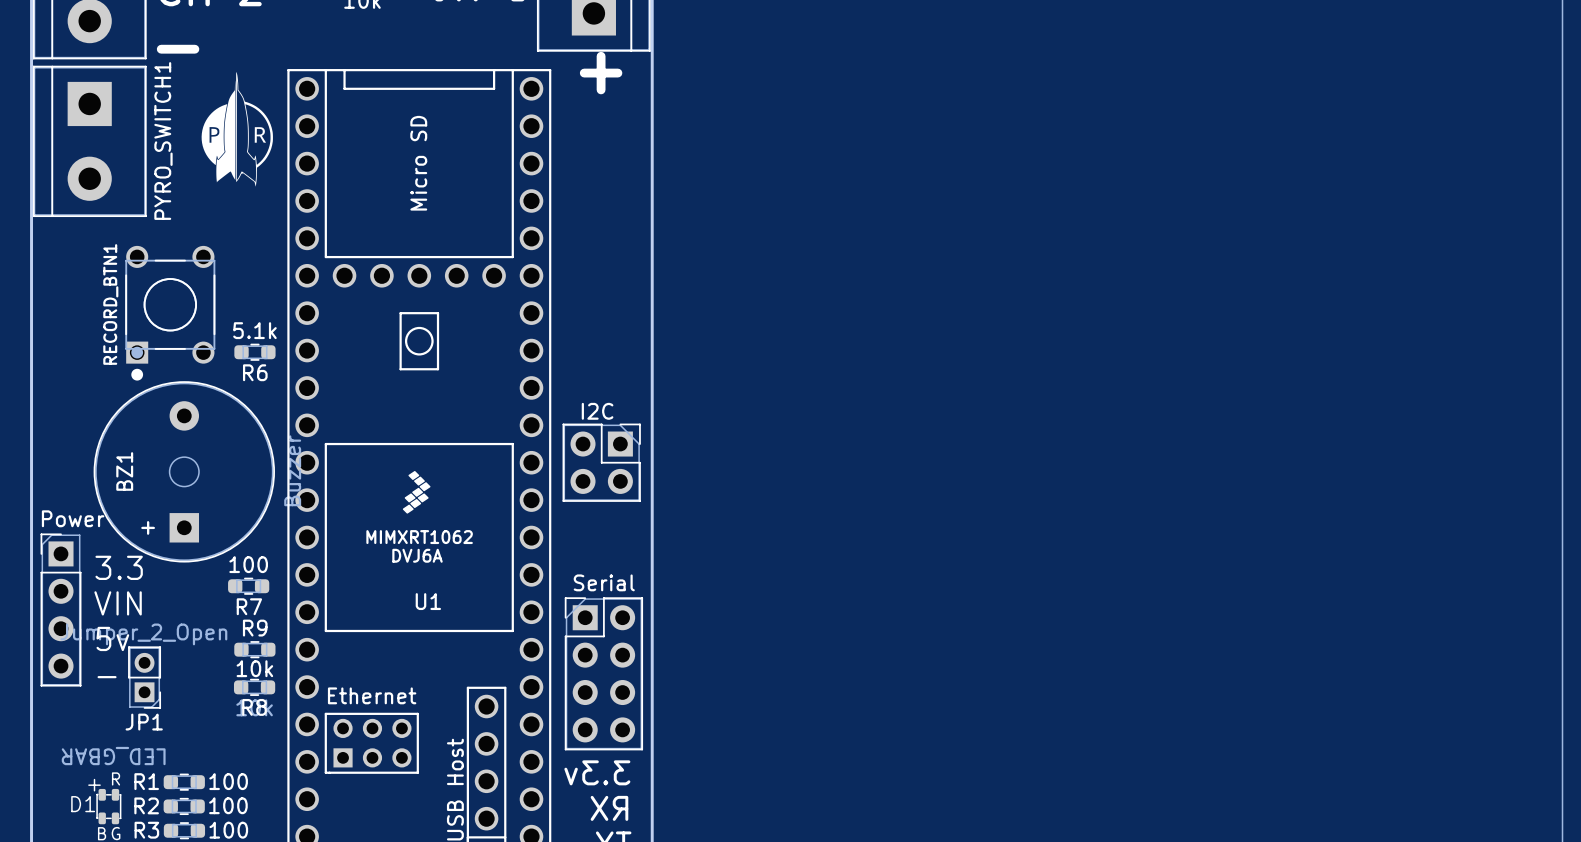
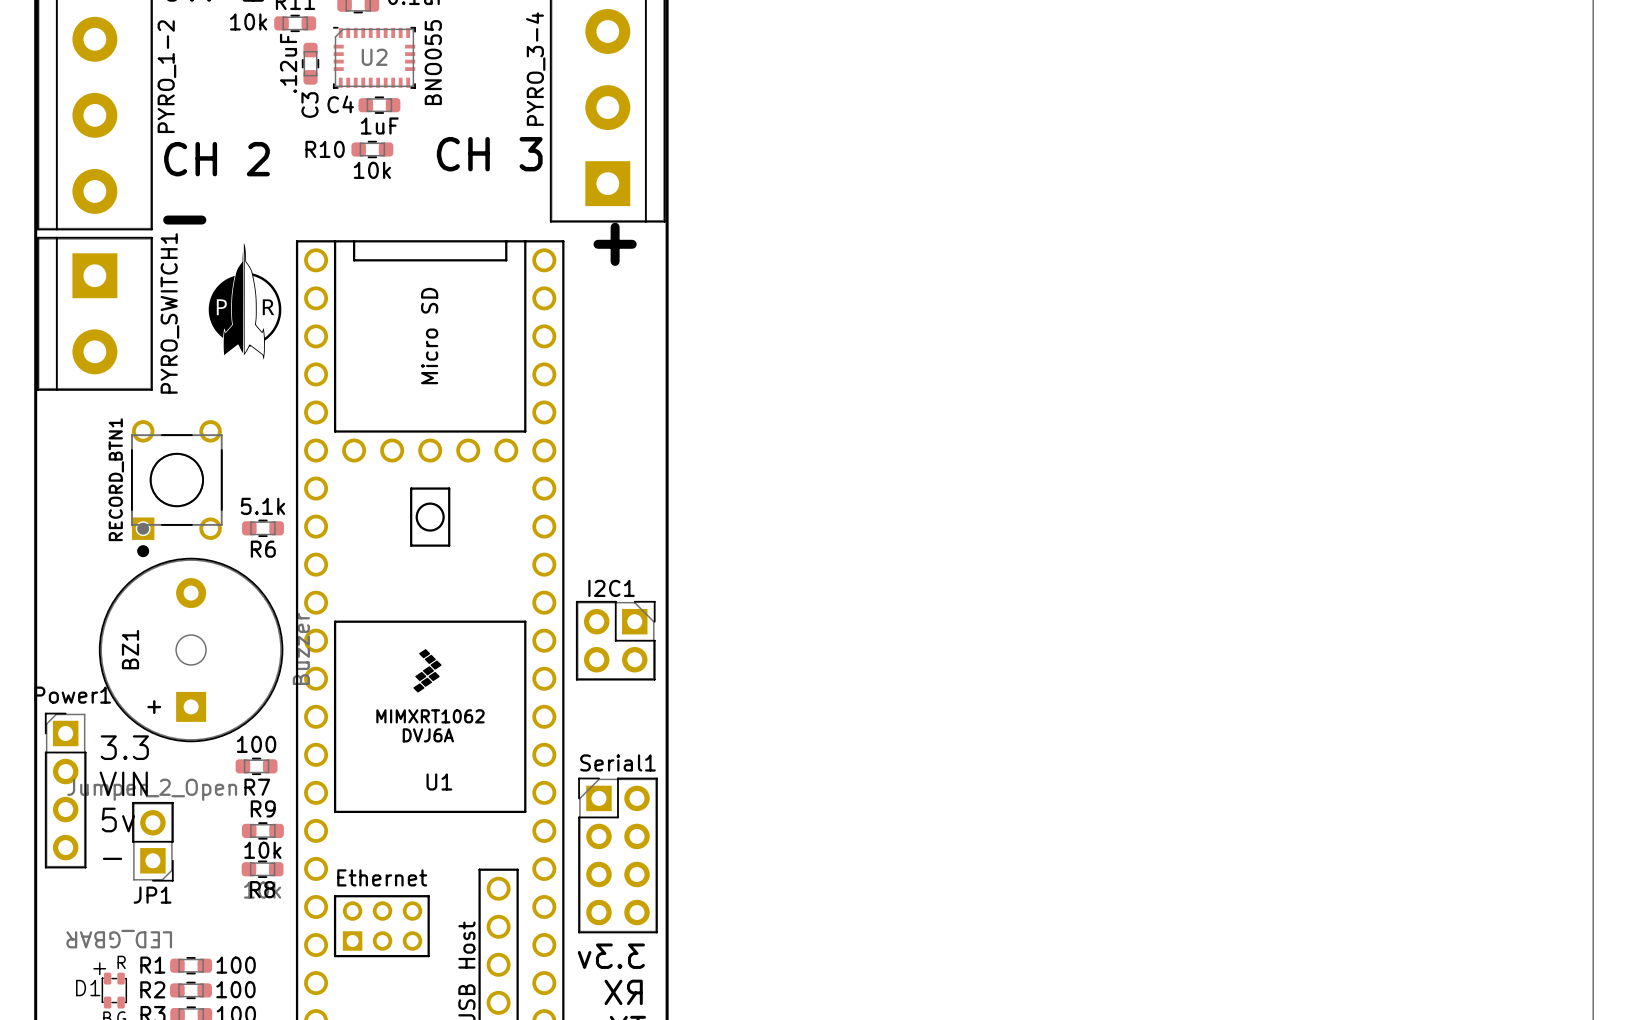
I2C name: I2C (597, 411) -> I2C1 (611, 588)
Power name: Power (73, 518) -> Power1 (72, 695)
Serial name: Serial (604, 582) -> Serial1 (617, 762)
JP1 footprint: [128, 646, 162, 709] -> [132, 801, 174, 882]

